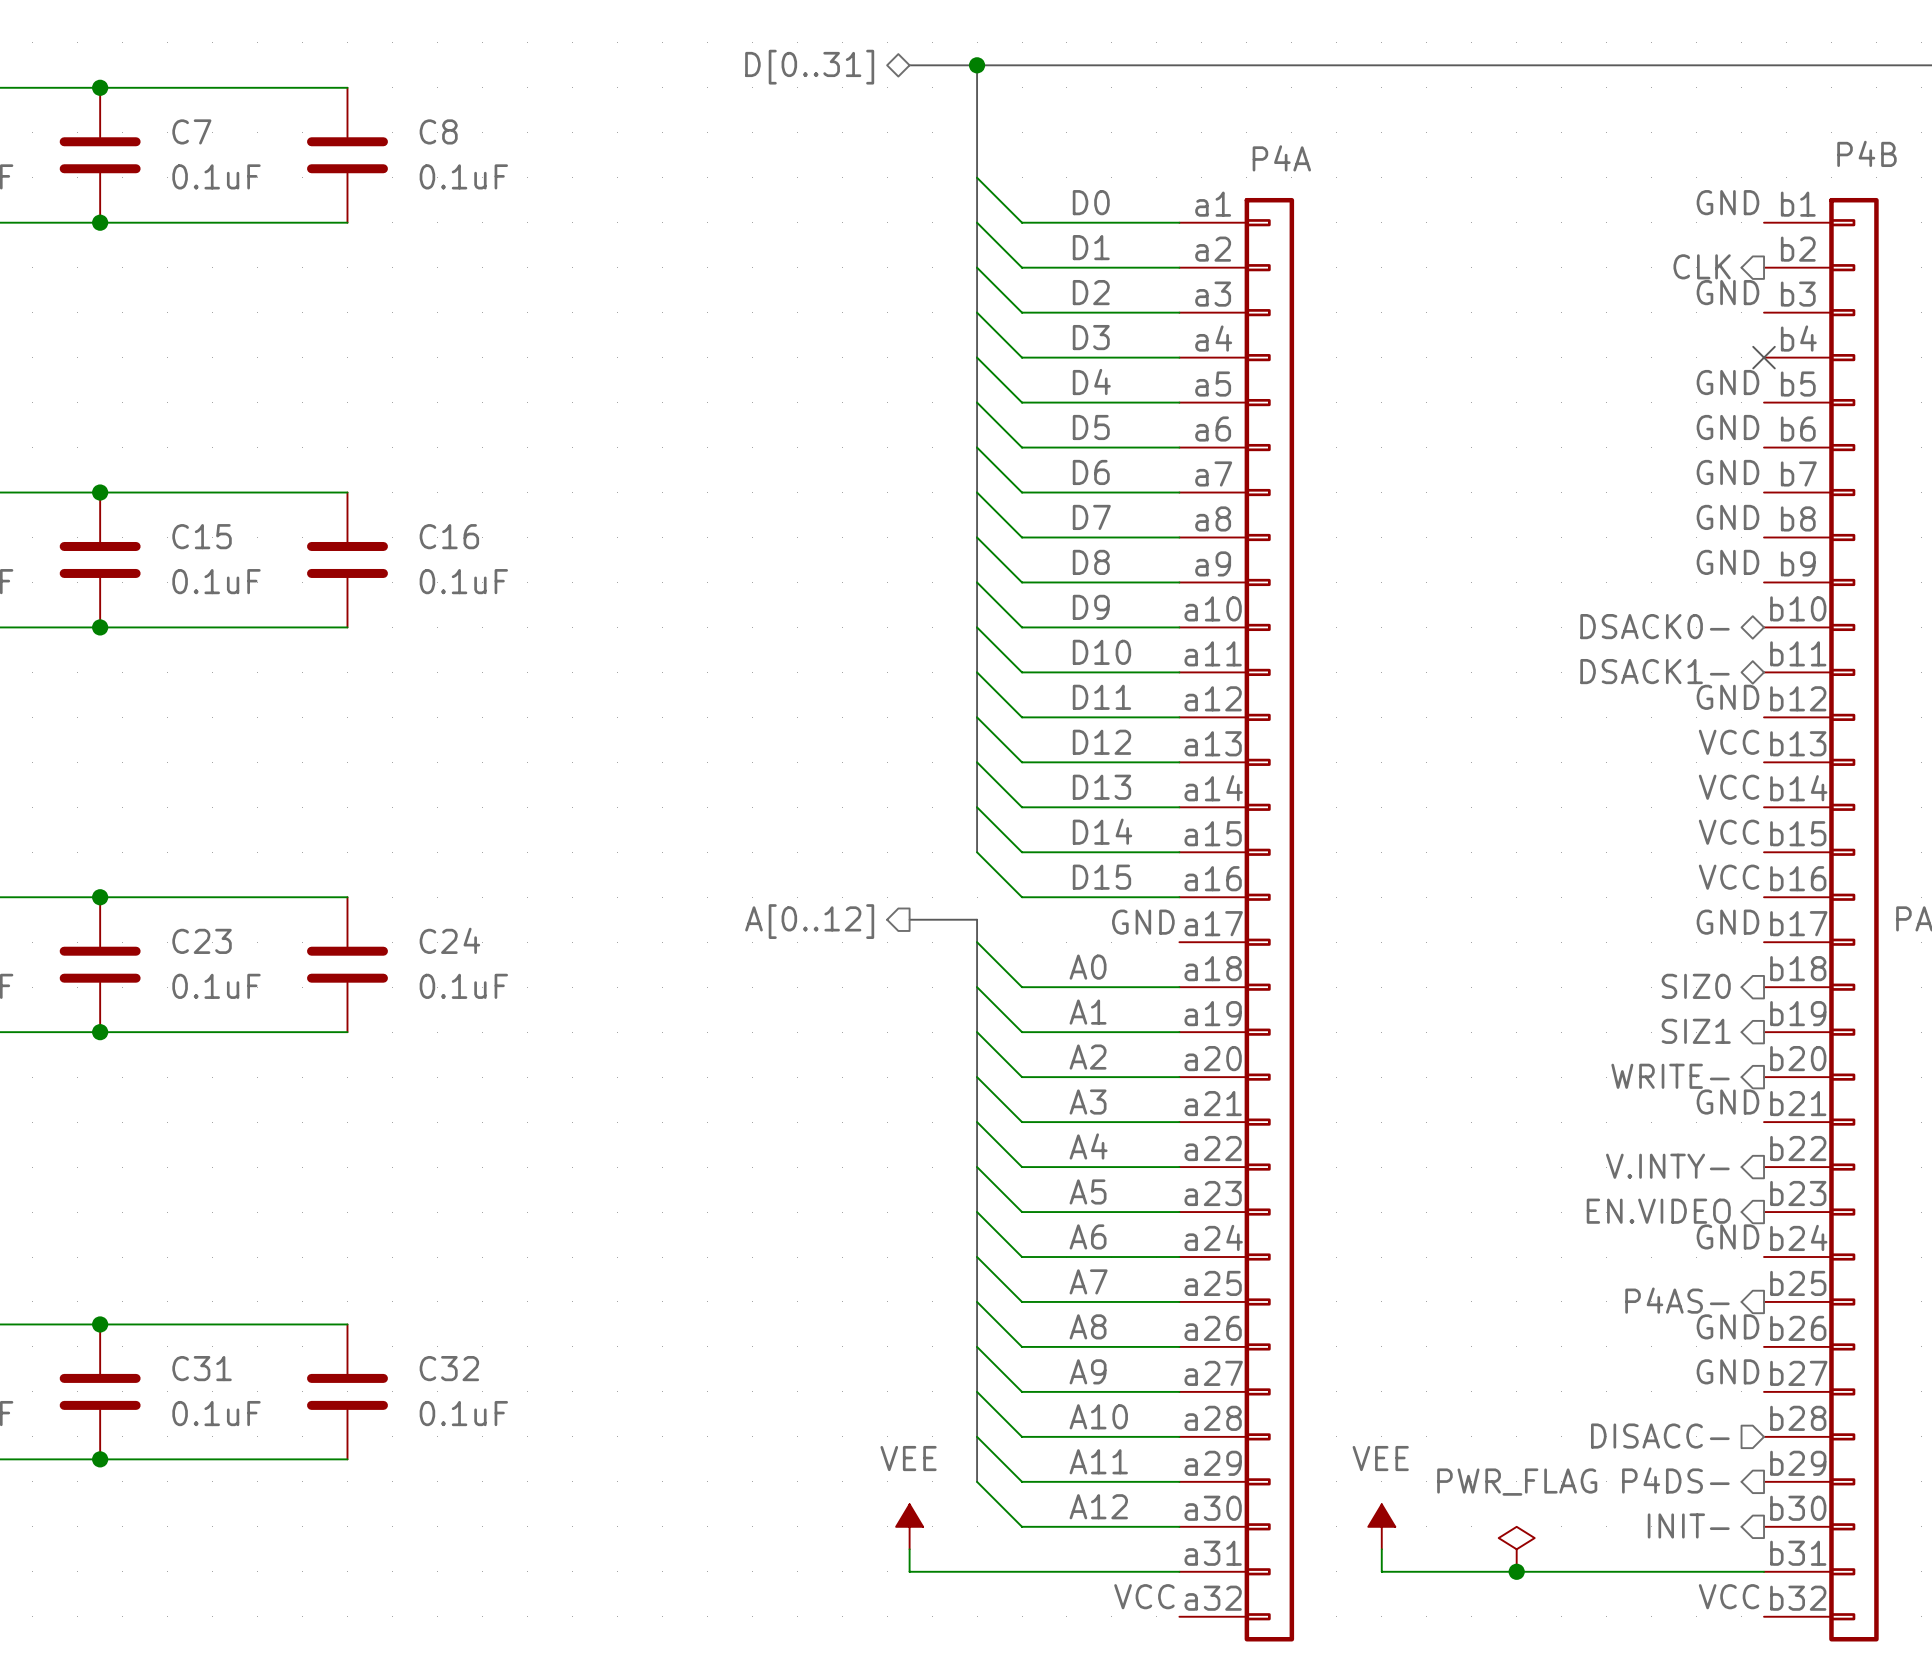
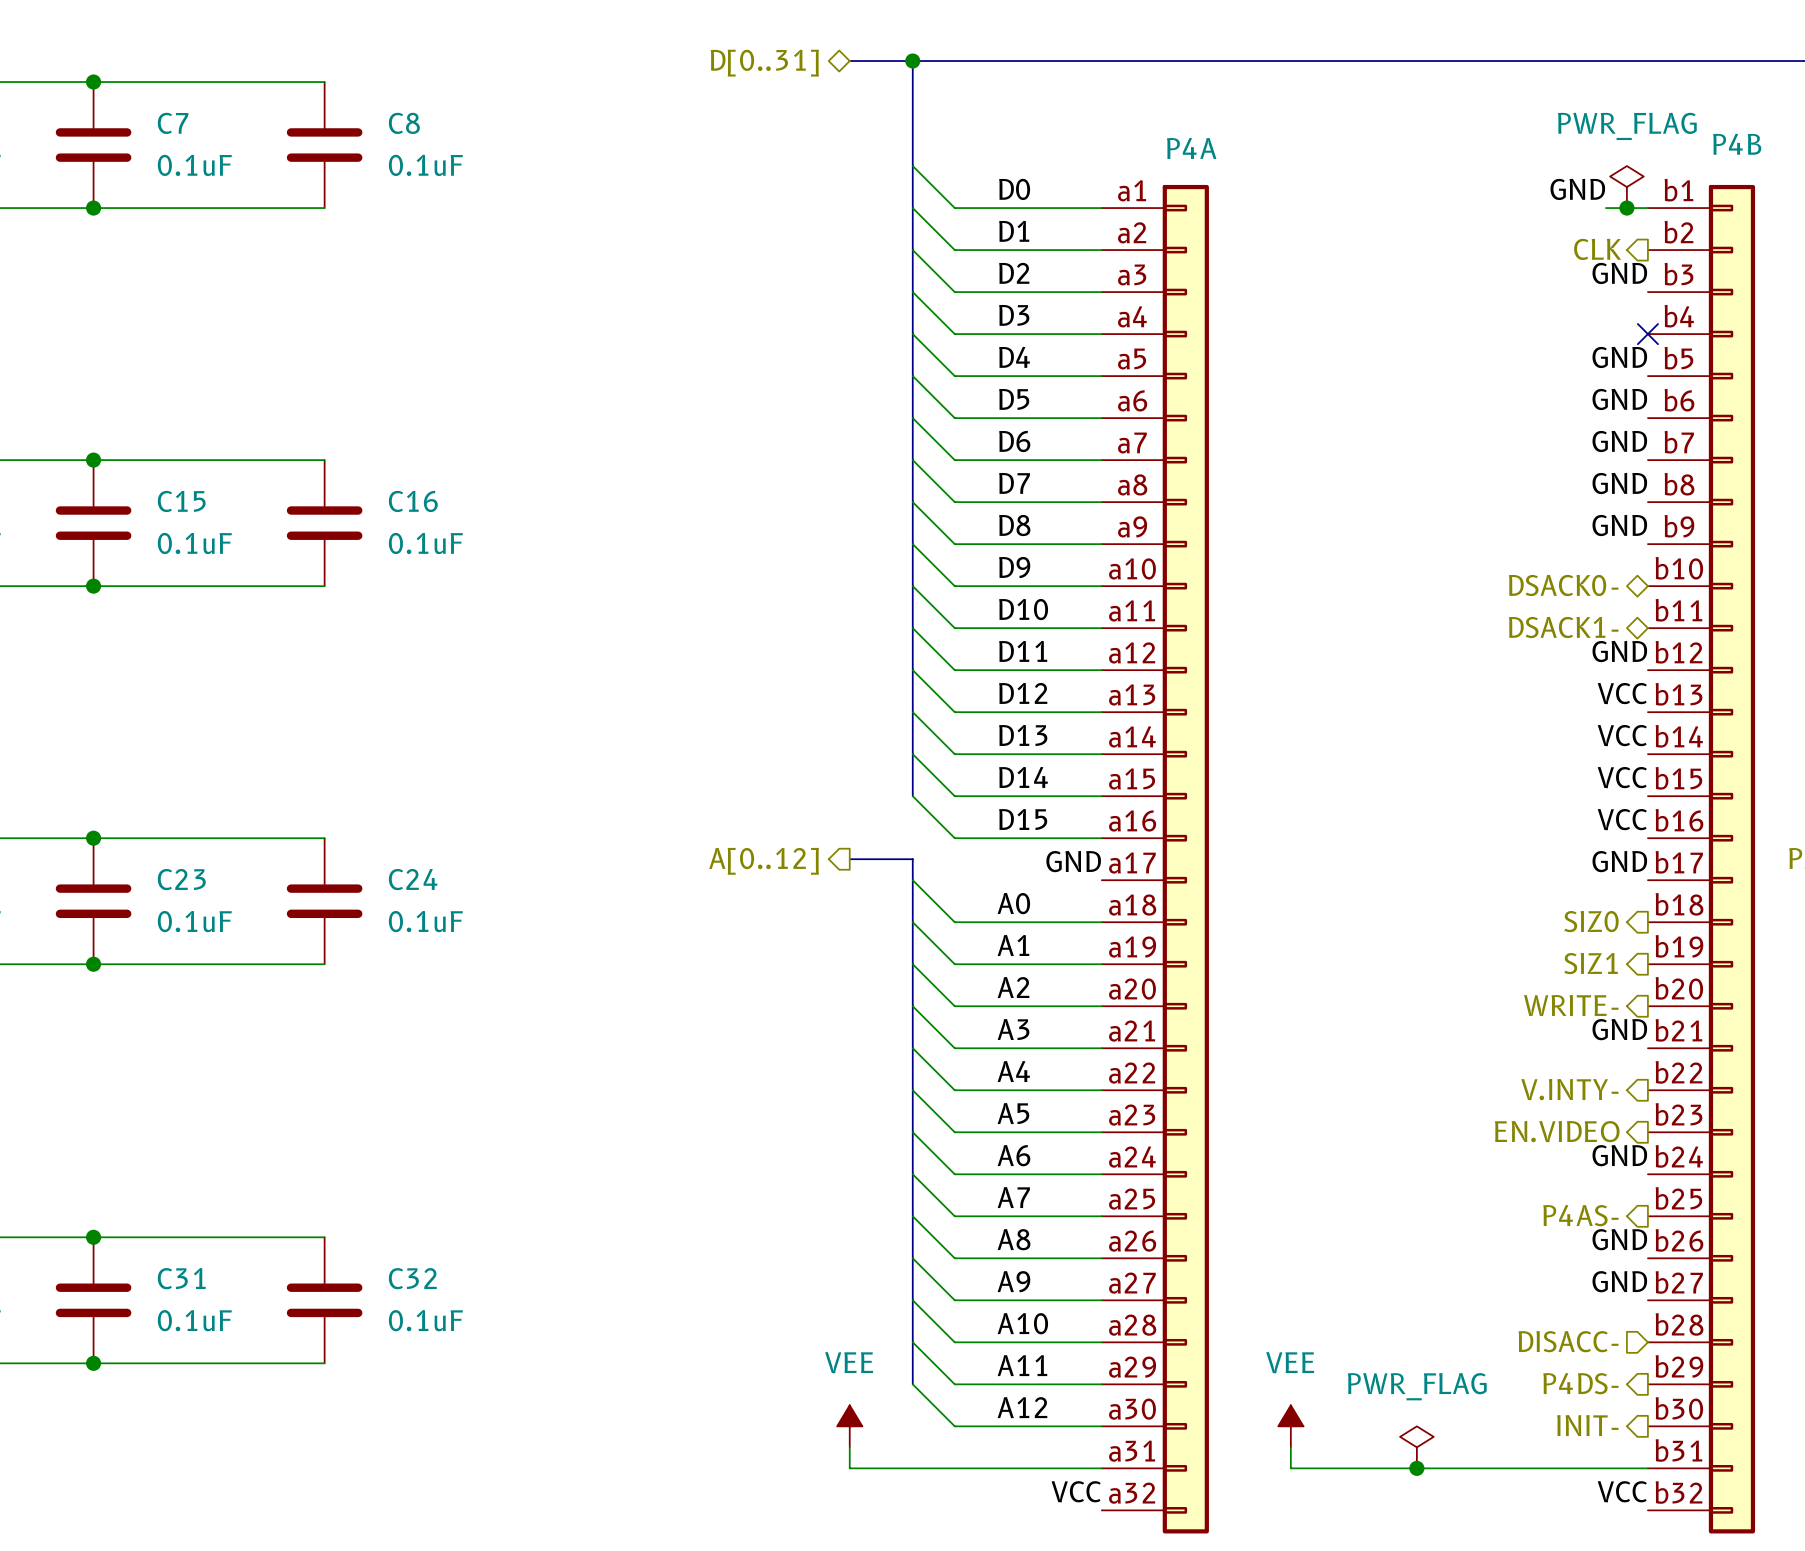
power symbol: none -> PWR_FLAG (1626, 187)
label position: GND (1727, 202) -> GND (1577, 189)
wire: none -> (1605, 208) (1647, 208)
junction: none -> (1626, 208)

